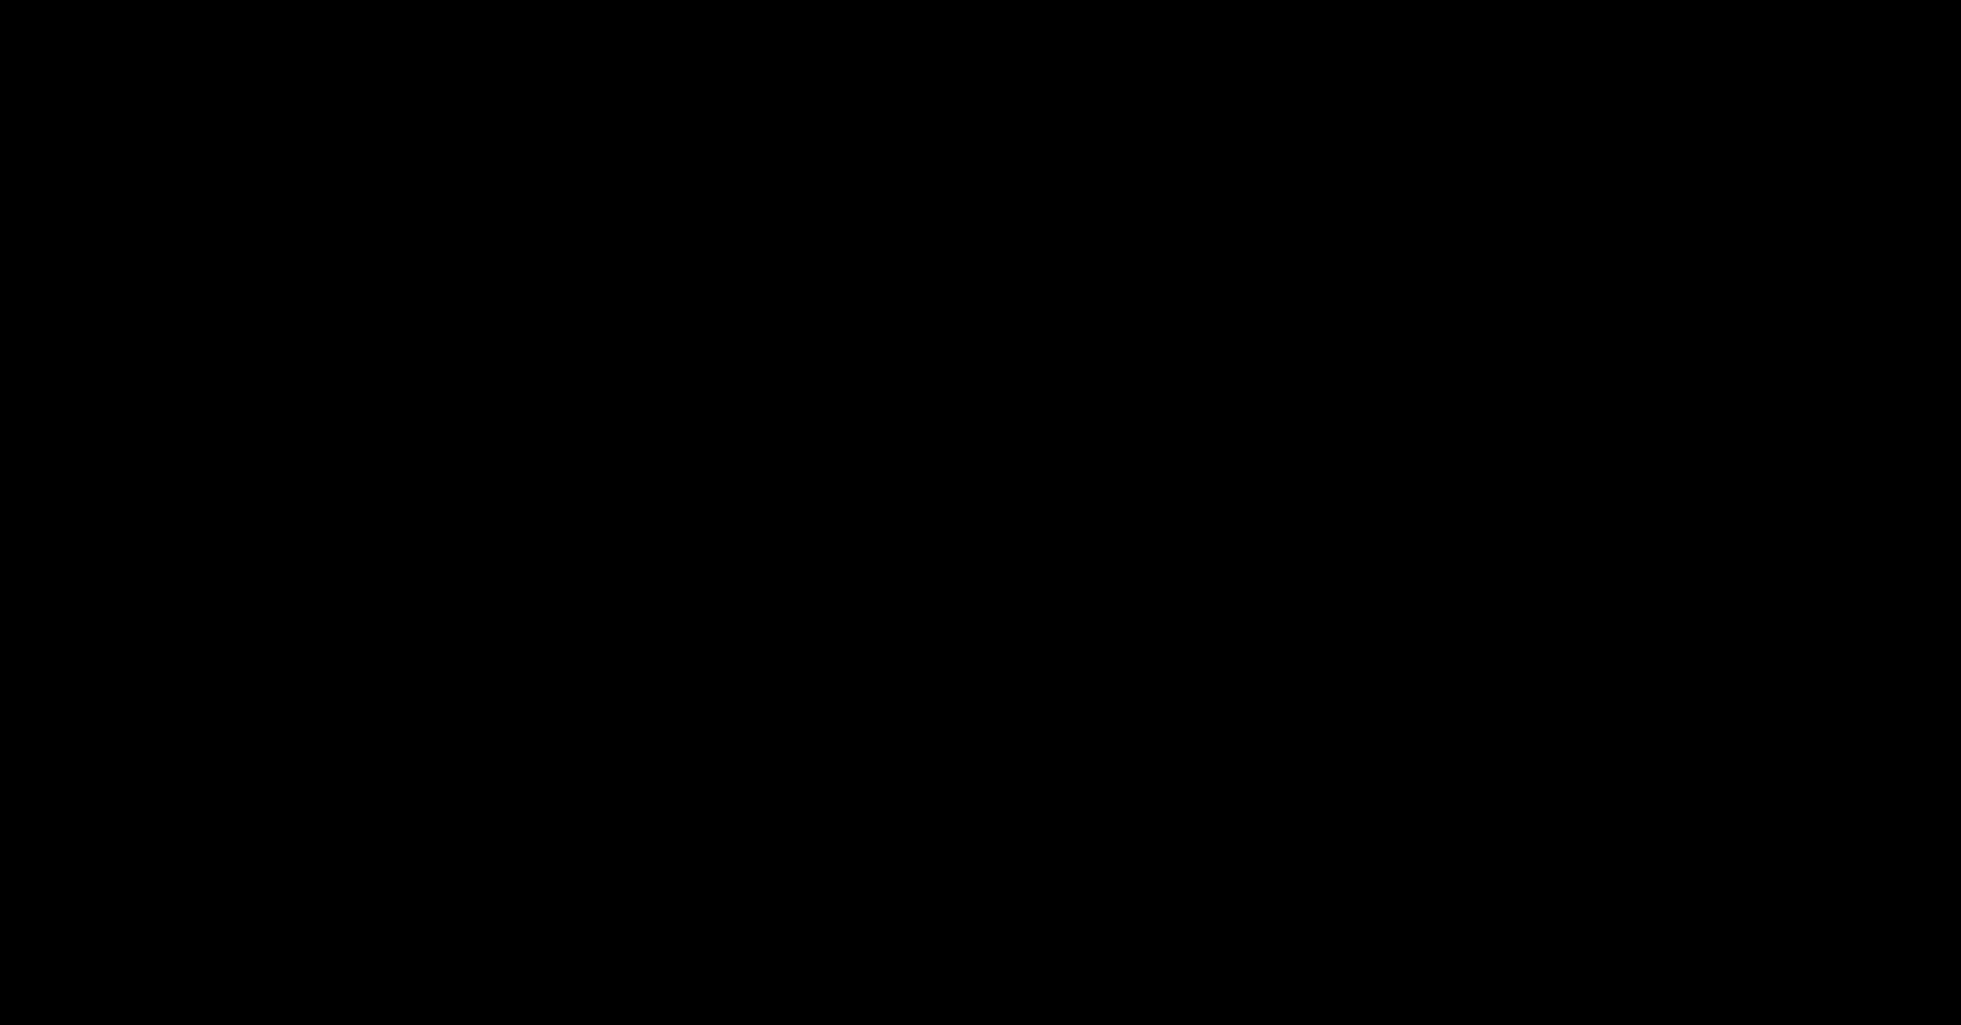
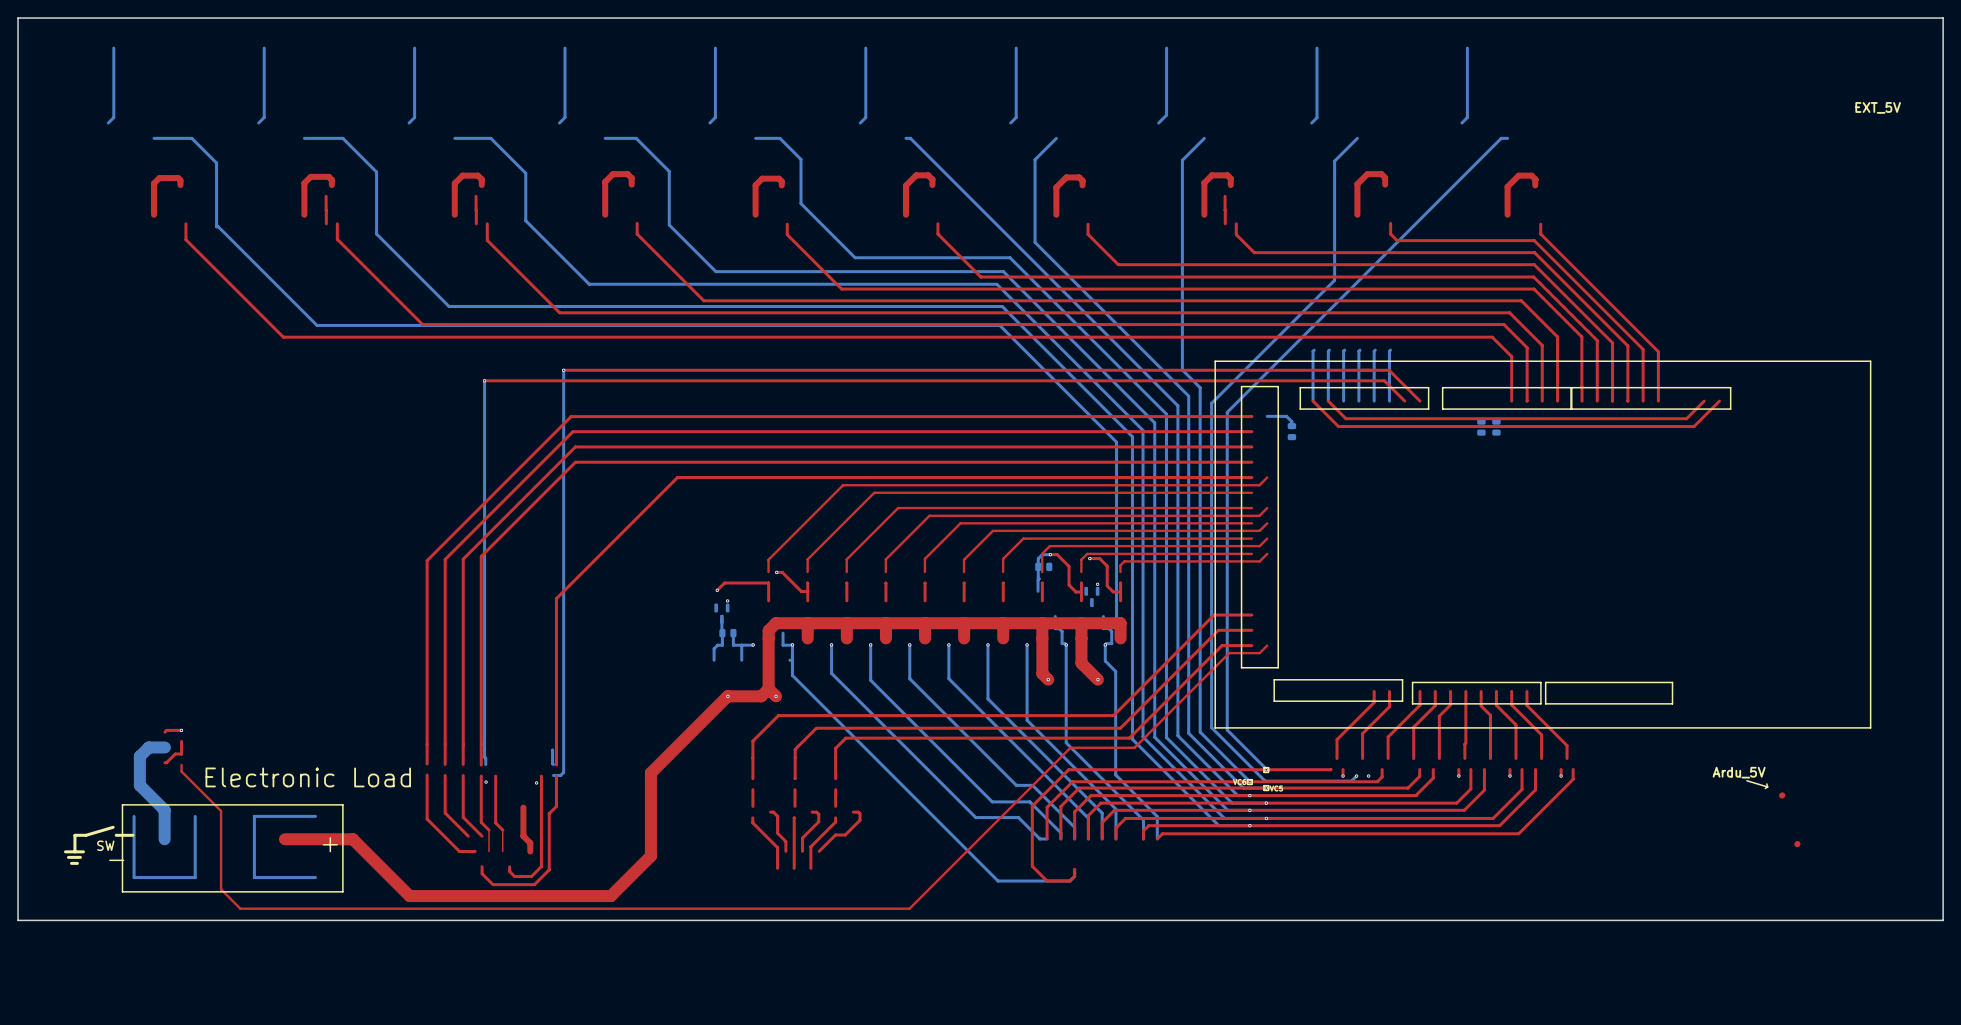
board edge: none -> (18, 18) (1943, 18) (1943, 920) (18, 920) (18, 18)
bottom track: none -> (113, 48) (113, 117) (108, 123)
bottom track: none -> (264, 48) (264, 117) (258, 123)
bottom track: none -> (414, 48) (414, 117) (409, 123)
bottom track: none -> (565, 48) (565, 117) (559, 123)
bottom track: none -> (715, 48) (715, 117) (709, 123)
bottom track: none -> (865, 48) (865, 117) (860, 123)
bottom track: none -> (1016, 48) (1016, 117) (1010, 123)
bottom track: none -> (1166, 48) (1166, 115) (1158, 123)
bottom track: none -> (1316, 48) (1316, 117) (1311, 123)
bottom track: none -> (1467, 48) (1467, 117) (1461, 123)
text: none -> EXT_5V (1878, 107)
bottom track: none -> (153, 138) (191, 138) (216, 163) (216, 226) (317, 325) (999, 325) (1116, 442) (1116, 621) (1109, 628) (1103, 628) (1103, 616)
bottom track: none -> (304, 138) (342, 138) (376, 172) (376, 234) (449, 306) (1002, 306) (1132, 436) (1132, 739) (1218, 825) (1249, 825)
bottom track: none -> (454, 138) (490, 138) (525, 173) (525, 220) (589, 284) (996, 284) (1143, 430) (1143, 736) (1224, 818) (1266, 818)
bottom track: none -> (605, 138) (636, 138) (669, 171) (669, 224) (715, 271) (1003, 271) (1154, 422) (1154, 737) (1227, 810) (1249, 810)
bottom track: none -> (755, 138) (779, 138) (801, 159) (801, 203) (855, 257) (1010, 257) (1166, 414) (1166, 737) (1232, 803) (1266, 803)
bottom track: none -> (905, 138) (910, 138) (1177, 405) (1177, 735) (1237, 795) (1249, 795)
bottom track: none -> (1056, 138) (1035, 159) (1035, 242) (1188, 396) (1188, 733) (1243, 788) (1266, 788)
bottom track: none -> (1204, 138) (1182, 160) (1182, 369) (1200, 387) (1200, 732) (1249, 781)
bottom track: none -> (1357, 138) (1334, 161) (1334, 280) (1211, 403) (1211, 727) (1265, 781) (1351, 781) (1356, 776)
bottom track: none -> (1507, 138) (1501, 138) (1227, 412) (1227, 730) (1266, 769)
top track: none -> (631, 184) (631, 178) (627, 174) (613, 174) (605, 181) (605, 214)
top track: none -> (1385, 184) (1385, 177) (1381, 174) (1367, 174) (1357, 184) (1357, 214)
top track: none -> (180, 185) (178, 178) (159, 178) (153, 183) (153, 214)
top track: none -> (331, 185) (331, 179) (328, 176) (310, 176) (304, 183) (304, 214)
top track: none -> (481, 185) (481, 179) (477, 175) (462, 175) (454, 183) (454, 214)
top track: none -> (781, 185) (781, 181) (779, 178) (762, 178) (755, 185) (755, 214)
top track: none -> (932, 185) (932, 179) (928, 175) (916, 175) (905, 185) (905, 214)
top track: none -> (1082, 185) (1082, 180) (1079, 177) (1066, 177) (1056, 187) (1056, 214)
top track: none -> (1230, 185) (1230, 178) (1227, 175) (1211, 175) (1204, 182) (1204, 214)
top track: none -> (1535, 185) (1535, 179) (1531, 175) (1518, 175) (1507, 186) (1507, 214)
top track: none -> (326, 196) (326, 223)
top track: none -> (476, 196) (476, 223)
top track: none -> (1225, 196) (1225, 223)
top track: none -> (185, 223) (185, 239) (283, 337) (1492, 337) (1511, 356) (1511, 401)
top track: none -> (337, 223) (337, 239) (422, 324) (1503, 324) (1527, 347) (1526, 401)
top track: none -> (487, 223) (487, 240) (559, 312) (1509, 312) (1542, 345) (1542, 401)
top track: none -> (637, 223) (637, 234) (703, 300) (1521, 300) (1557, 336) (1557, 401)
top track: none -> (937, 223) (937, 234) (980, 277) (1533, 277) (1597, 340) (1597, 401)
top track: none -> (1236, 223) (1236, 234) (1254, 252) (1534, 252) (1627, 345) (1627, 401)
top track: none -> (1390, 223) (1390, 234) (1397, 240) (1534, 240) (1643, 349) (1643, 401)
top track: none -> (787, 224) (787, 234) (841, 289) (1534, 289) (1581, 336) (1581, 401)
top track: none -> (1088, 224) (1088, 234) (1118, 264) (1534, 264) (1612, 342) (1612, 401)
top track: none -> (1540, 224) (1540, 234) (1658, 351) (1658, 401)
bottom track: none -> (1314, 350) (1313, 401)
bottom track: none -> (1329, 350) (1328, 401)
bottom track: none -> (1344, 350) (1343, 401)
bottom track: none -> (1360, 350) (1358, 401)
bottom track: none -> (1375, 350) (1374, 401)
bottom track: none -> (1390, 350) (1389, 401)
line: none -> (1215, 361) (1870, 361) (1870, 727) (1215, 727) (1215, 361)
top track: none -> (563, 370) (1389, 370) (1420, 401)
bottom track: none -> (563, 370) (563, 772) (560, 775) (553, 775)
via: none -> (563, 370)
top track: none -> (484, 380) (1384, 380) (1404, 401)
bottom track: none -> (484, 380) (485, 764)
via: none -> (484, 380)
line: none -> (1241, 386) (1278, 386) (1278, 667) (1241, 667) (1241, 386)
line: none -> (1300, 387) (1428, 387) (1428, 409) (1300, 409) (1300, 387)
line: none -> (1442, 387) (1571, 387) (1571, 409) (1442, 409) (1442, 387)
line: none -> (1571, 387) (1730, 387) (1730, 409) (1571, 409) (1571, 387)
top track: none -> (1313, 401) (1338, 426) (1694, 426) (1719, 401)
top track: none -> (1328, 401) (1345, 418) (1686, 418) (1704, 401)
top track: none -> (1251, 416) (571, 416) (427, 560) (427, 764)
bottom track: none -> (1267, 416) (1286, 416) (1291, 421) (1291, 426)
part: none -> (1481, 427)
part: none -> (1496, 427)
top track: none -> (1251, 431) (572, 431) (445, 559) (445, 764)
part: none -> (1291, 431)
top track: none -> (1251, 446) (575, 446) (463, 559) (463, 764)
top track: none -> (1251, 462) (575, 462) (481, 556) (481, 765)
top track: none -> (1251, 477) (677, 477) (556, 598) (556, 765)
top track: none -> (1267, 477) (1259, 485) (843, 485) (768, 559) (768, 572)
top track: none -> (1251, 492) (874, 492) (807, 559) (807, 572)
top track: none -> (1251, 508) (898, 508) (846, 559) (846, 572)
top track: none -> (1267, 508) (1259, 515) (929, 515) (885, 559) (885, 572)
top track: none -> (1251, 523) (960, 523) (924, 558) (924, 572)
top track: none -> (1267, 523) (1259, 530) (992, 530) (964, 559) (964, 572)
top track: none -> (1251, 538) (1023, 538) (1003, 558) (1003, 572)
top track: none -> (1267, 538) (1259, 546) (1049, 546) (1042, 553) (1042, 572)
top track: none -> (1251, 553) (1087, 553) (1081, 559) (1081, 572)
top track: none -> (1267, 553) (1259, 561) (1124, 561) (1120, 565) (1120, 572)
top track: none -> (1050, 554) (1057, 554) (1069, 566) (1069, 585) (1076, 592) (1081, 591)
bottom track: none -> (1050, 554) (1042, 554) (1038, 558) (1038, 591)
via: none -> (1050, 554)
top track: none -> (1089, 558) (1099, 558) (1107, 566) (1107, 585) (1113, 591) (1120, 591)
via: none -> (1089, 558)
part: none -> (1043, 566)
top track: none -> (776, 572) (782, 572) (801, 591) (807, 591)
via: none -> (776, 572)
top track: none -> (807, 583) (807, 600)
top track: none -> (846, 583) (846, 600)
top track: none -> (885, 583) (885, 600)
top track: none -> (924, 583) (925, 600)
top track: none -> (964, 583) (964, 600)
top track: none -> (1003, 583) (1003, 600)
top track: none -> (1042, 583) (1042, 600)
top track: none -> (1081, 583) (1081, 600)
top track: none -> (1120, 583) (1120, 600)
via: none -> (1097, 584)
top track: none -> (717, 590) (724, 583) (768, 583) (768, 600)
via: none -> (717, 590)
part: none -> (1091, 596)
via: none -> (727, 600)
part: none -> (721, 613)
top track: none -> (1251, 615) (1214, 615) (1113, 715) (778, 715) (752, 741) (752, 778)
bottom track: none -> (1055, 616) (1055, 628) (1059, 628) (1062, 631) (1062, 643) (1066, 644) (1066, 742) (1143, 820) (1143, 838)
bottom track: none -> (721, 619) (722, 645) (717, 645) (714, 648) (714, 660)
top track: none -> (807, 623) (807, 638)
top track: none -> (846, 623) (846, 638)
top track: none -> (885, 623) (885, 638)
top track: none -> (924, 623) (925, 638)
top track: none -> (964, 623) (964, 638)
top track: none -> (1003, 623) (1003, 638)
top track: none -> (1042, 623) (1042, 673) (1048, 679)
top track: none -> (1081, 623) (1081, 663) (1097, 679)
bottom track: none -> (1108, 628) (1111, 631) (1111, 643) (1105, 644) (1105, 661) (1115, 671) (1115, 774) (1157, 816) (1157, 838)
top track: none -> (1251, 630) (1218, 630) (1120, 728) (816, 728) (795, 749) (795, 778)
part: none -> (727, 633)
bottom track: none -> (733, 633) (733, 645) (753, 644)
bottom track: none -> (783, 633) (783, 645) (792, 644) (792, 675) (998, 881) (1069, 881) (1074, 876) (1074, 869)
top track: none -> (1120, 638) (1120, 623) (776, 623) (768, 630) (768, 688)
via: none -> (753, 644)
via: none -> (792, 644)
bottom track: none -> (831, 644) (831, 673) (975, 817) (1018, 817) (1039, 838) (1047, 838)
via: none -> (831, 644)
bottom track: none -> (870, 644) (870, 680) (992, 801) (1029, 801) (1060, 832) (1060, 838)
via: none -> (870, 644)
bottom track: none -> (909, 644) (909, 678) (1016, 785) (1032, 785) (1074, 827) (1074, 838)
via: none -> (909, 644)
bottom track: none -> (948, 644) (948, 678) (1088, 818) (1088, 838)
via: none -> (948, 644)
bottom track: none -> (987, 644) (987, 698) (1102, 813) (1102, 838)
via: none -> (987, 644)
bottom track: none -> (1027, 644) (1027, 720) (1115, 809) (1115, 838)
via: none -> (1027, 644)
via: none -> (1066, 644)
via: none -> (1105, 644)
bottom track: none -> (741, 645) (741, 660)
top track: none -> (1251, 645) (1222, 645) (1129, 738) (845, 738) (835, 748) (835, 778)
top track: none -> (1267, 645) (1259, 653) (1229, 653) (1134, 747) (1070, 747) (909, 908) (240, 908) (221, 889) (221, 811) (181, 771) (181, 764)
bottom track: none -> (789, 660) (792, 660)
via: none -> (1048, 679)
via: none -> (1097, 679)
line: none -> (1274, 679) (1402, 679) (1402, 701) (1274, 701) (1274, 679)
line: none -> (1412, 682) (1540, 682) (1540, 703) (1412, 703) (1412, 682)
line: none -> (1545, 682) (1672, 682) (1672, 703) (1545, 703) (1545, 682)
top track: none -> (768, 688) (776, 696)
top track: none -> (768, 688) (761, 696) (727, 696) (650, 773) (650, 856) (610, 896) (409, 896) (352, 839) (284, 839)
top track: none -> (1374, 691) (1374, 702) (1337, 739) (1337, 758)
top track: none -> (1389, 691) (1389, 706) (1362, 733) (1362, 758)
top track: none -> (1420, 691) (1420, 705) (1388, 737) (1388, 758)
top track: none -> (1435, 691) (1435, 705) (1413, 727) (1413, 758)
top track: none -> (1450, 691) (1450, 704) (1439, 716) (1439, 758)
top track: none -> (1465, 691) (1464, 758)
top track: none -> (1481, 691) (1481, 705) (1490, 715) (1490, 758)
top track: none -> (1496, 691) (1496, 705) (1516, 724) (1516, 758)
top track: none -> (1511, 691) (1511, 704) (1541, 734) (1541, 758)
top track: none -> (1526, 691) (1526, 705) (1567, 745) (1567, 758)
via: none -> (727, 696)
via: none -> (776, 696)
top track: none -> (181, 730) (166, 730) (164, 732)
via: none -> (181, 730)
top track: none -> (181, 741) (181, 754) (175, 754) (164, 762)
bottom track: none -> (164, 747) (148, 747) (139, 756) (139, 785) (164, 810) (164, 839)
bottom track: none -> (552, 750) (553, 764)
via: none -> (1266, 769)
top track: none -> (1331, 769) (1068, 769) (1032, 806) (1032, 866) (1047, 881) (1069, 881) (1074, 876) (1074, 869)
top track: none -> (1343, 769) (1343, 776)
top track: none -> (1382, 769) (1382, 776) (1377, 781) (1072, 781) (1047, 807) (1047, 838)
top track: none -> (1419, 769) (1419, 776) (1408, 788) (1079, 788) (1060, 806) (1060, 838)
top track: none -> (1433, 769) (1433, 778) (1416, 794)
top track: none -> (1458, 769) (1458, 776)
top track: none -> (1470, 769) (1470, 788) (1456, 803) (1100, 803) (1088, 815) (1088, 838)
top track: none -> (1484, 769) (1484, 790) (1464, 810) (1114, 810) (1102, 822) (1102, 838)
top track: none -> (1509, 769) (1509, 776)
top track: none -> (1522, 769) (1522, 789) (1493, 818) (1125, 818) (1115, 828) (1115, 838)
top track: none -> (1535, 769) (1535, 789) (1499, 825) (1148, 825) (1143, 830) (1143, 838)
top track: none -> (1561, 769) (1561, 776)
top track: none -> (1573, 769) (1573, 779) (1518, 833) (1162, 833) (1157, 838)
part: none -> (1266, 770)
text: none -> Ardu_5V (1739, 772)
top track: none -> (427, 774) (427, 819) (459, 851) (475, 851)
top track: none -> (445, 775) (445, 813) (468, 836)
top track: none -> (463, 775) (463, 817) (482, 836)
top track: none -> (481, 776) (481, 822) (489, 830) (488, 851)
top track: none -> (495, 776) (495, 822) (502, 830) (502, 851)
top track: none -> (541, 776) (541, 866) (531, 876) (514, 876) (509, 871) (509, 866)
top track: none -> (556, 776) (556, 806) (549, 813) (549, 869) (534, 884) (492, 884) (482, 873) (482, 866)
via: none -> (1343, 776)
via: none -> (1356, 776)
via: none -> (1368, 776)
via: none -> (1458, 776)
via: none -> (1509, 776)
via: none -> (1561, 776)
text: none -> Electronic Load (308, 777)
line: none -> (1746, 780) (1767, 786)
via: none -> (1249, 781)
via: none -> (486, 782)
via: none -> (536, 782)
part: none -> (1249, 782)
line: none -> (1766, 783) (1767, 786)
line: none -> (1767, 786) (1765, 788)
part: none -> (1266, 788)
via: none -> (1266, 788)
top track: none -> (752, 789) (752, 806)
top track: none -> (795, 789) (795, 806)
top track: none -> (835, 789) (835, 806)
via: none -> (1249, 795)
top track: none -> (1416, 795) (1090, 795) (1074, 811) (1074, 838)
top track: none -> (1782, 795) (1782, 795)
via: none -> (1266, 803)
line: none -> (122, 804) (342, 804) (342, 891) (122, 891) (122, 804)
top track: none -> (523, 807) (523, 836) (530, 843) (530, 851)
via: none -> (1249, 810)
top track: none -> (770, 812) (777, 816) (777, 833) (785, 841) (785, 851)
top track: none -> (812, 812) (818, 814) (818, 821) (802, 838) (802, 851)
top track: none -> (853, 812) (859, 813) (859, 820) (845, 835) (835, 835) (819, 851)
bottom track: none -> (134, 816) (134, 877) (195, 877) (195, 816)
bottom track: none -> (315, 816) (254, 816) (254, 877) (315, 877)
top track: none -> (752, 817) (752, 822) (777, 847) (777, 868)
top track: none -> (794, 817) (794, 868)
top track: none -> (835, 817) (835, 822) (810, 846) (810, 868)
via: none -> (1266, 818)
via: none -> (1249, 825)
line: none -> (113, 827) (86, 835) (74, 835) (74, 851)
line: none -> (116, 835) (132, 835)
text: none -> + (330, 844)
top track: none -> (1797, 843) (1797, 844)
text: none -> SW (105, 845)
line: none -> (65, 851) (83, 851)
line: none -> (68, 857) (80, 857)
text: none -> - (116, 860)
line: none -> (71, 863) (77, 863)

